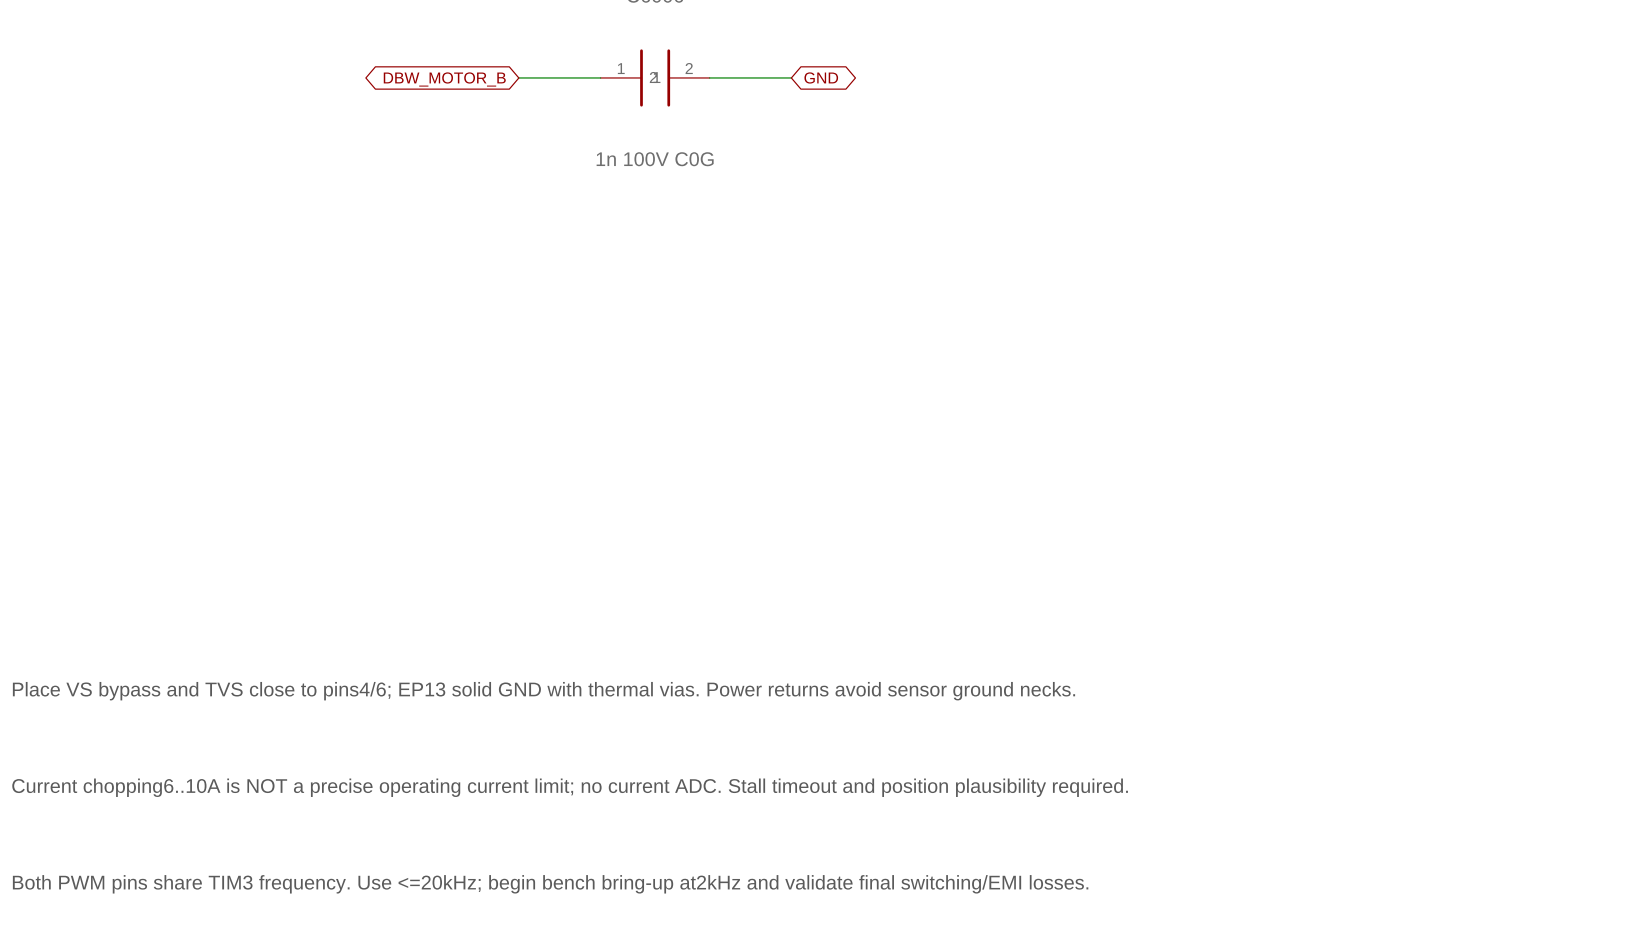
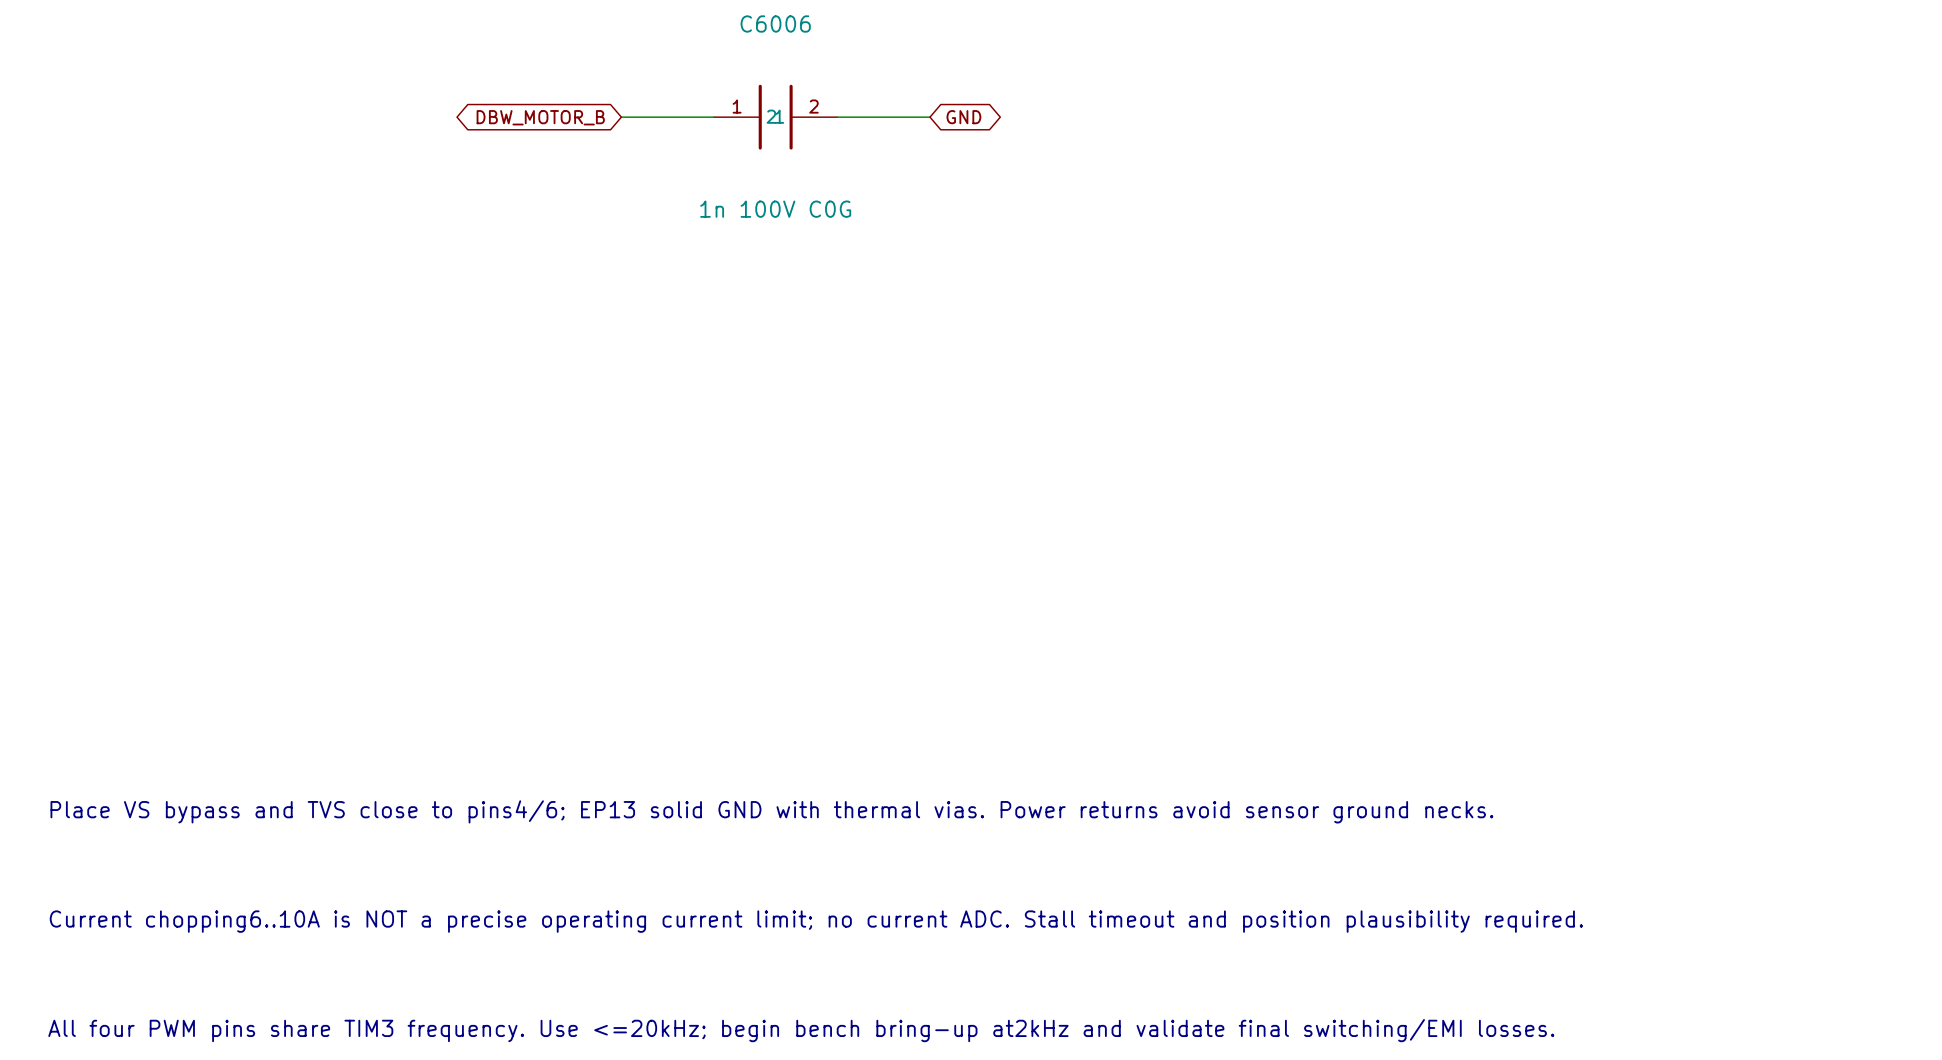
text: Both PWM pins share TIM3 frequency. Use <=20kHz; begin bench bring-up at2kHz and validate final switching/EMI losses. (550, 884) -> All four PWM pins share TIM3 frequency. Use <=20kHz; begin bench bring-up at2kHz and validate final switching/EMI losses. (801, 1030)

